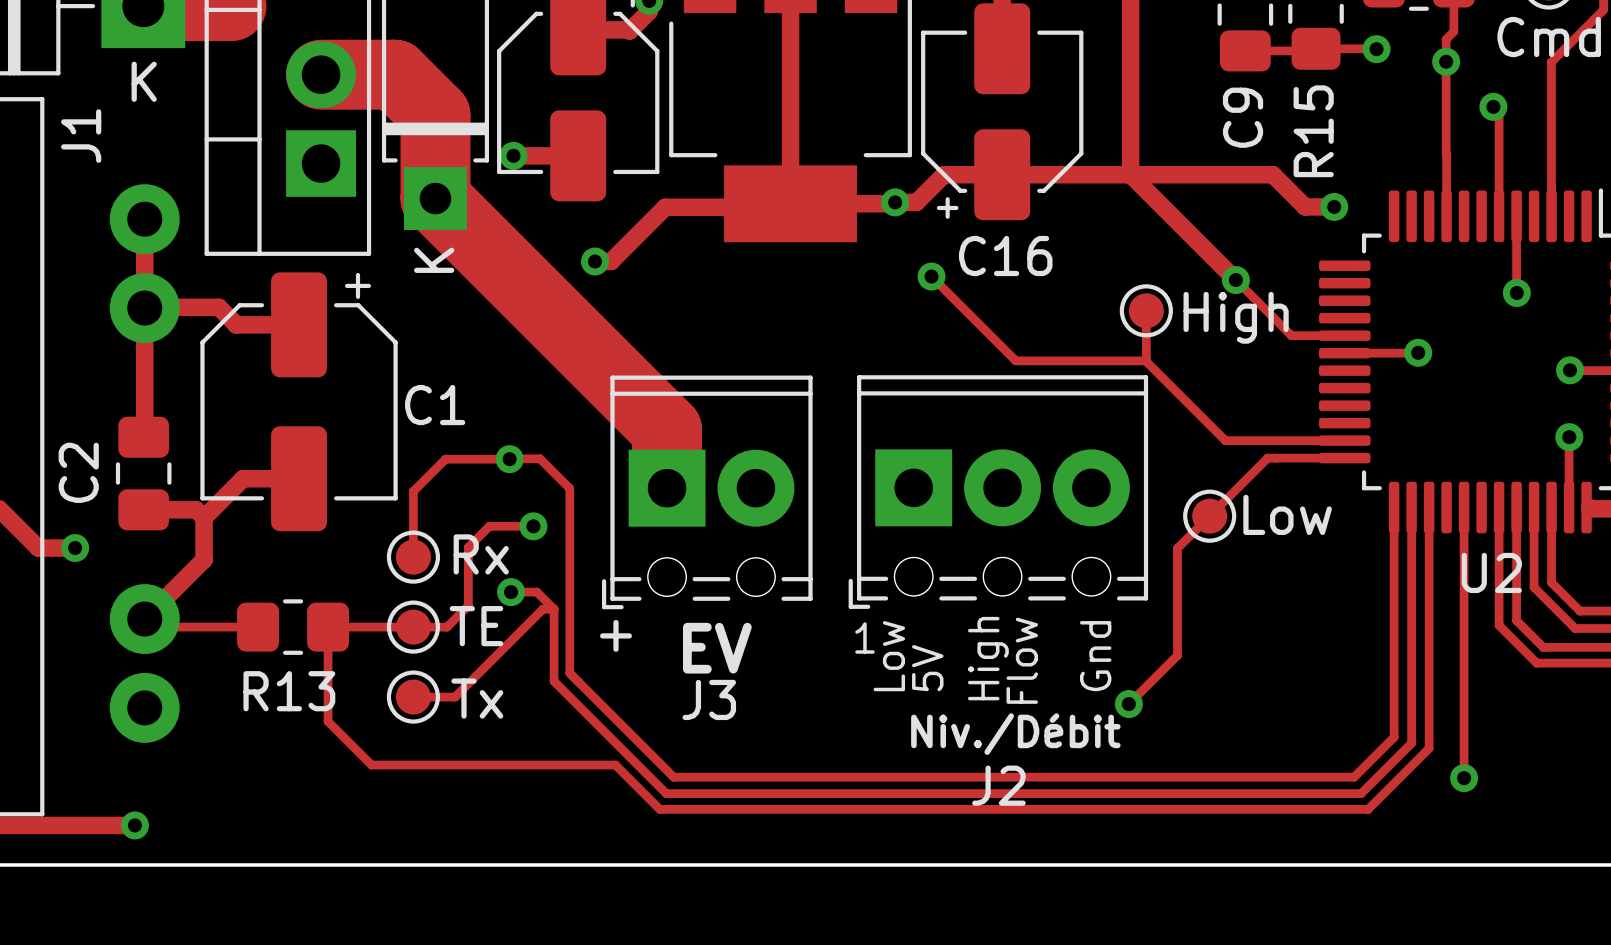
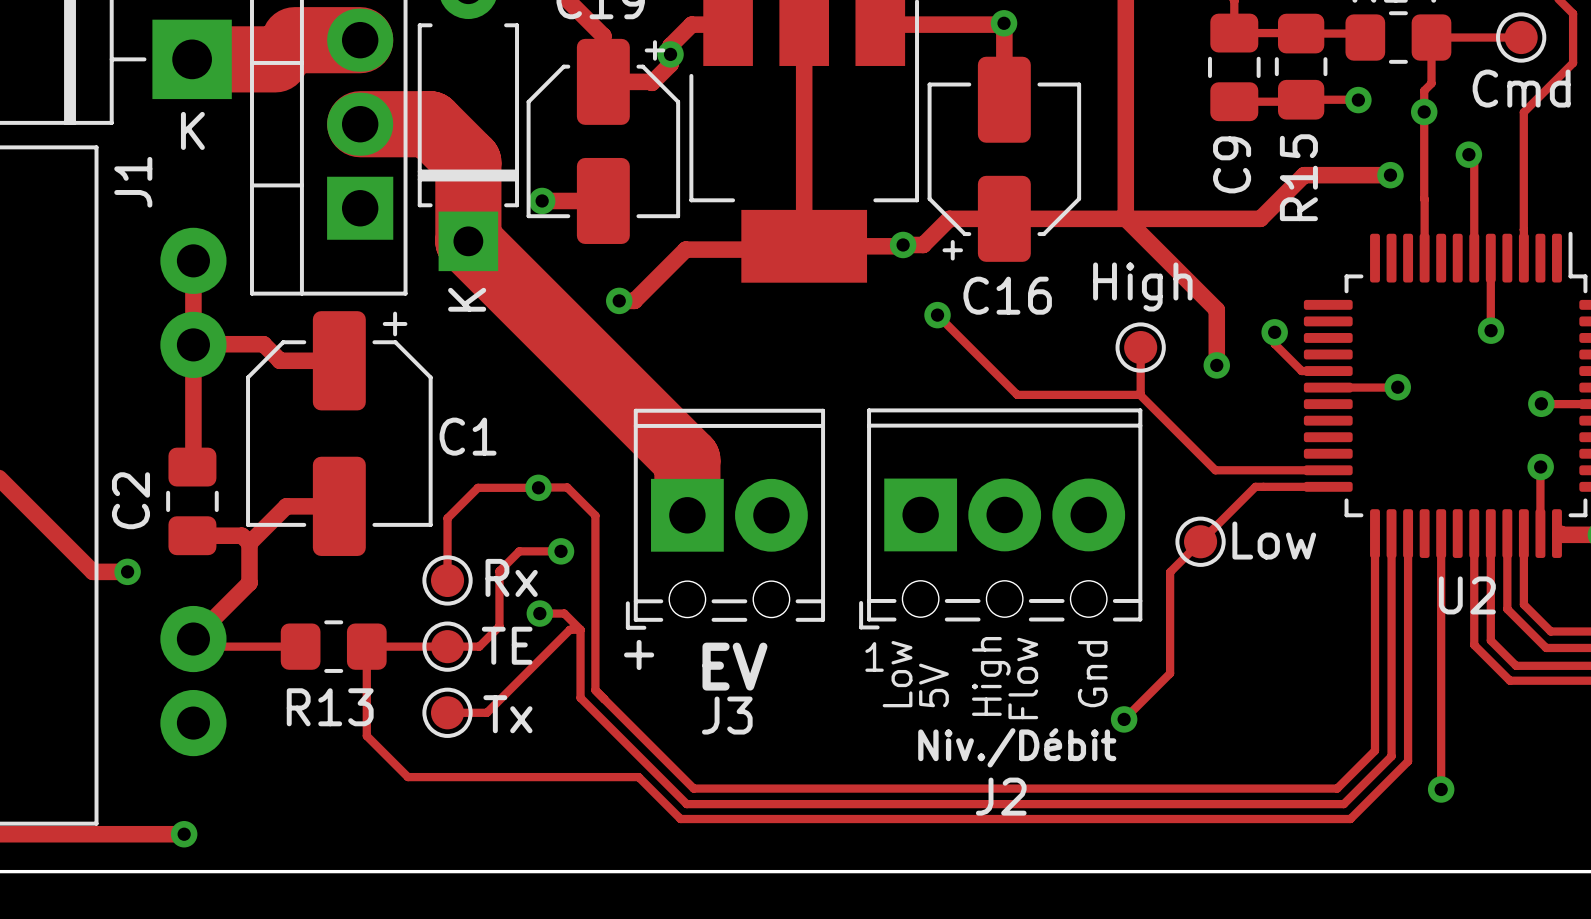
via: none -> (1390, 175)
track: (1273, 174) (1305, 206) (1334, 206) -> (1260, 218) (1304, 175) (1390, 175)
via: (1334, 206) -> none
track: (1226, 270) (1291, 335) (1316, 335) -> (1274, 332) (1274, 344) (1301, 371)
track: none -> (1216, 309) (1216, 365)
via: (1235, 280) -> none
via: none -> (1274, 332)
part value position: High (1236, 317) -> High (1142, 286)
via: none -> (1216, 365)

